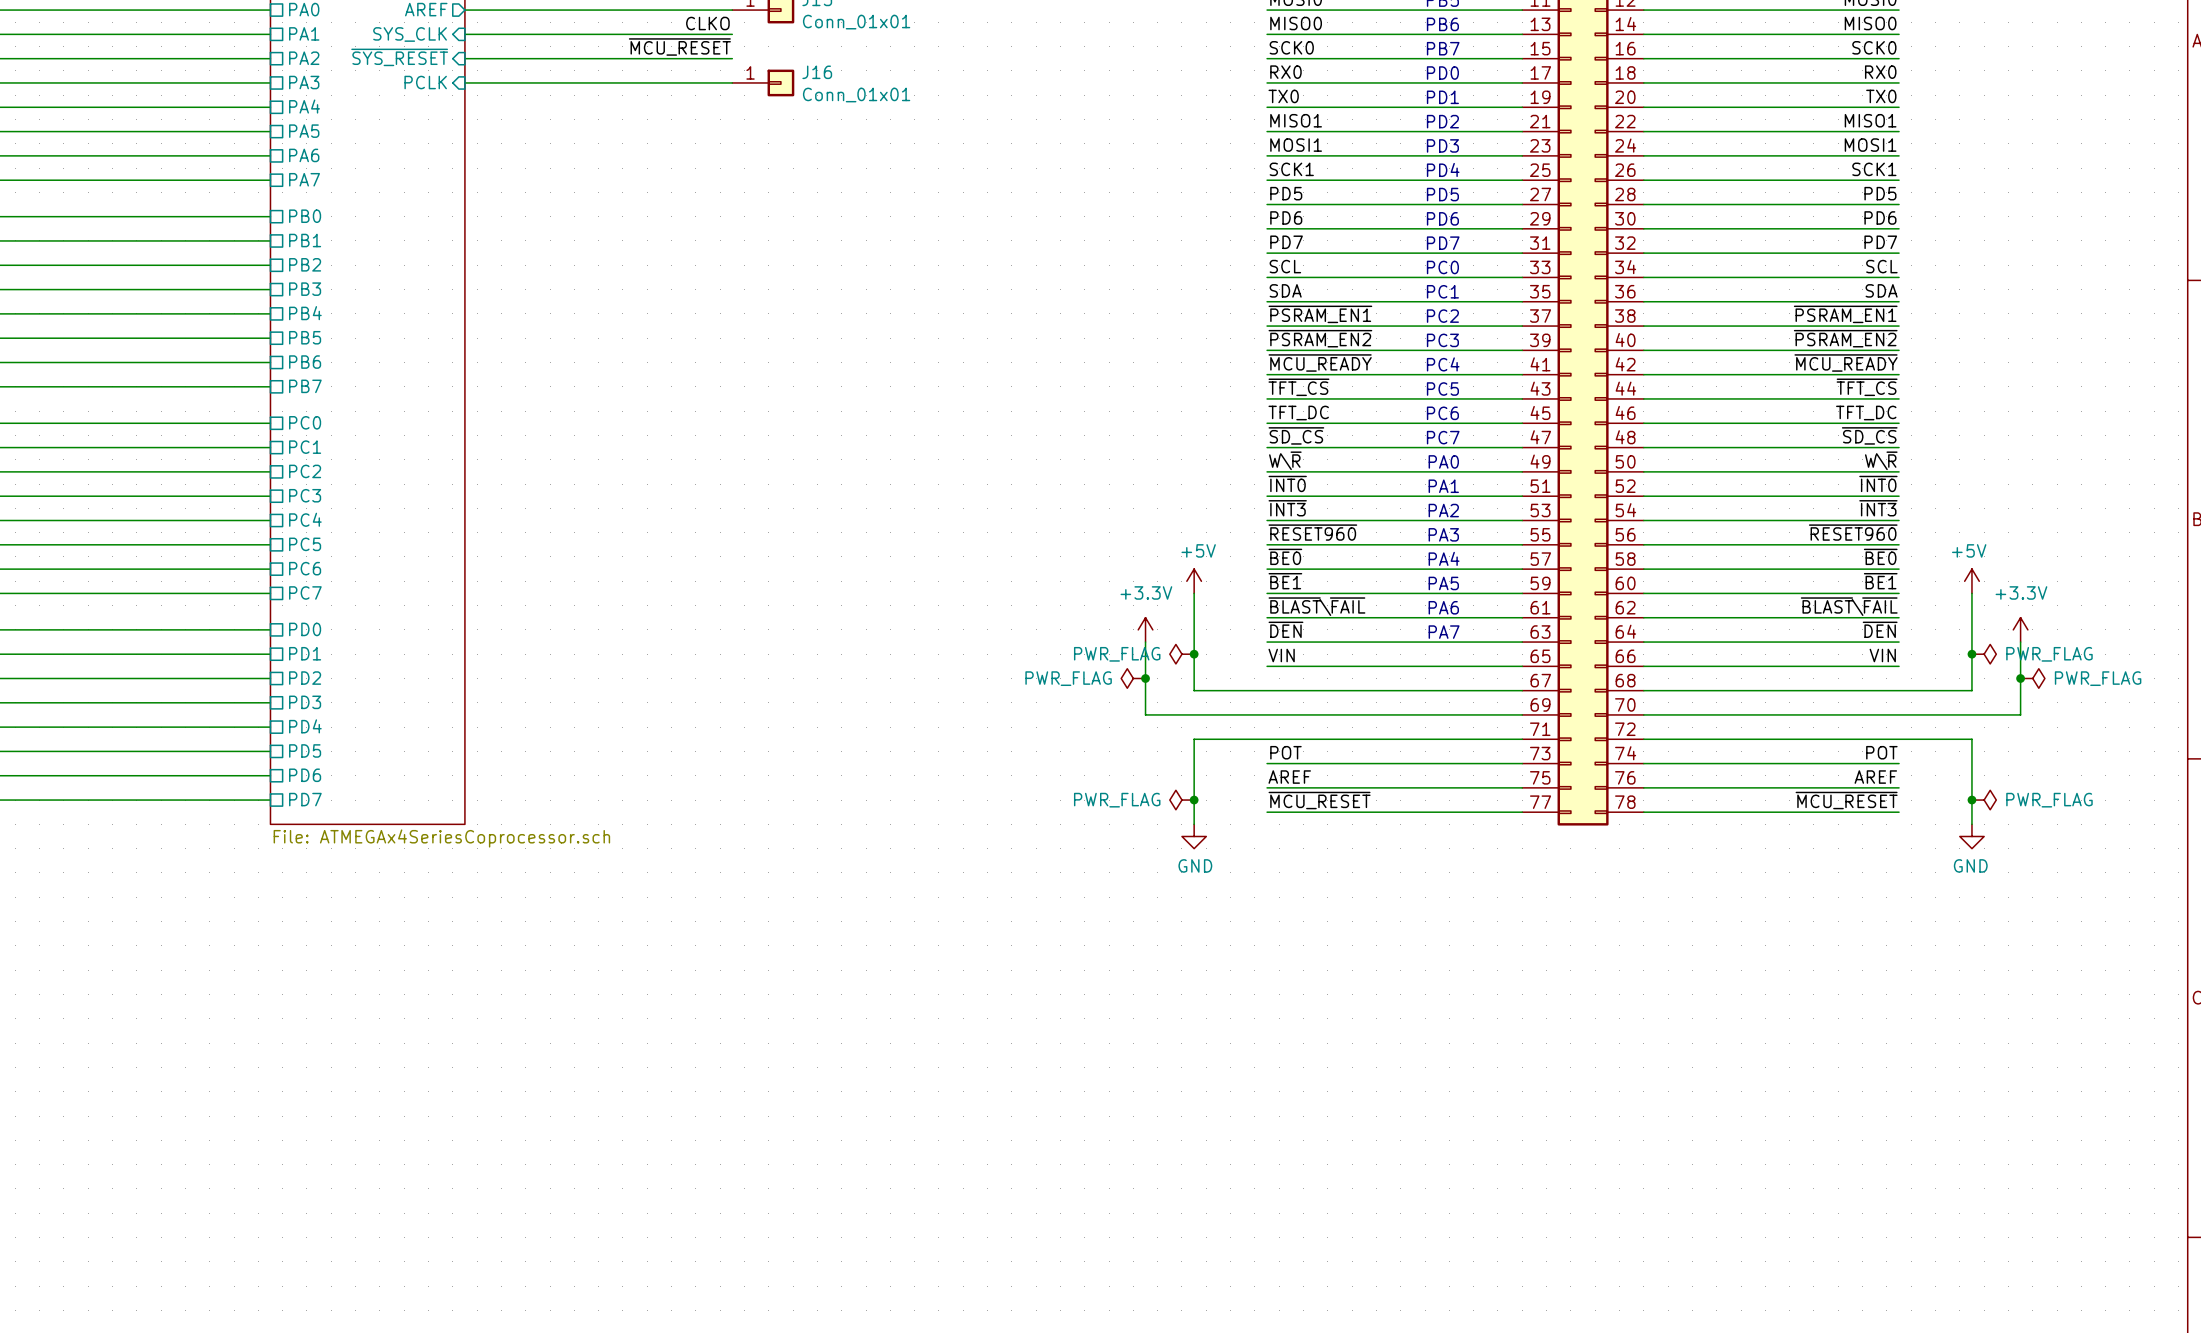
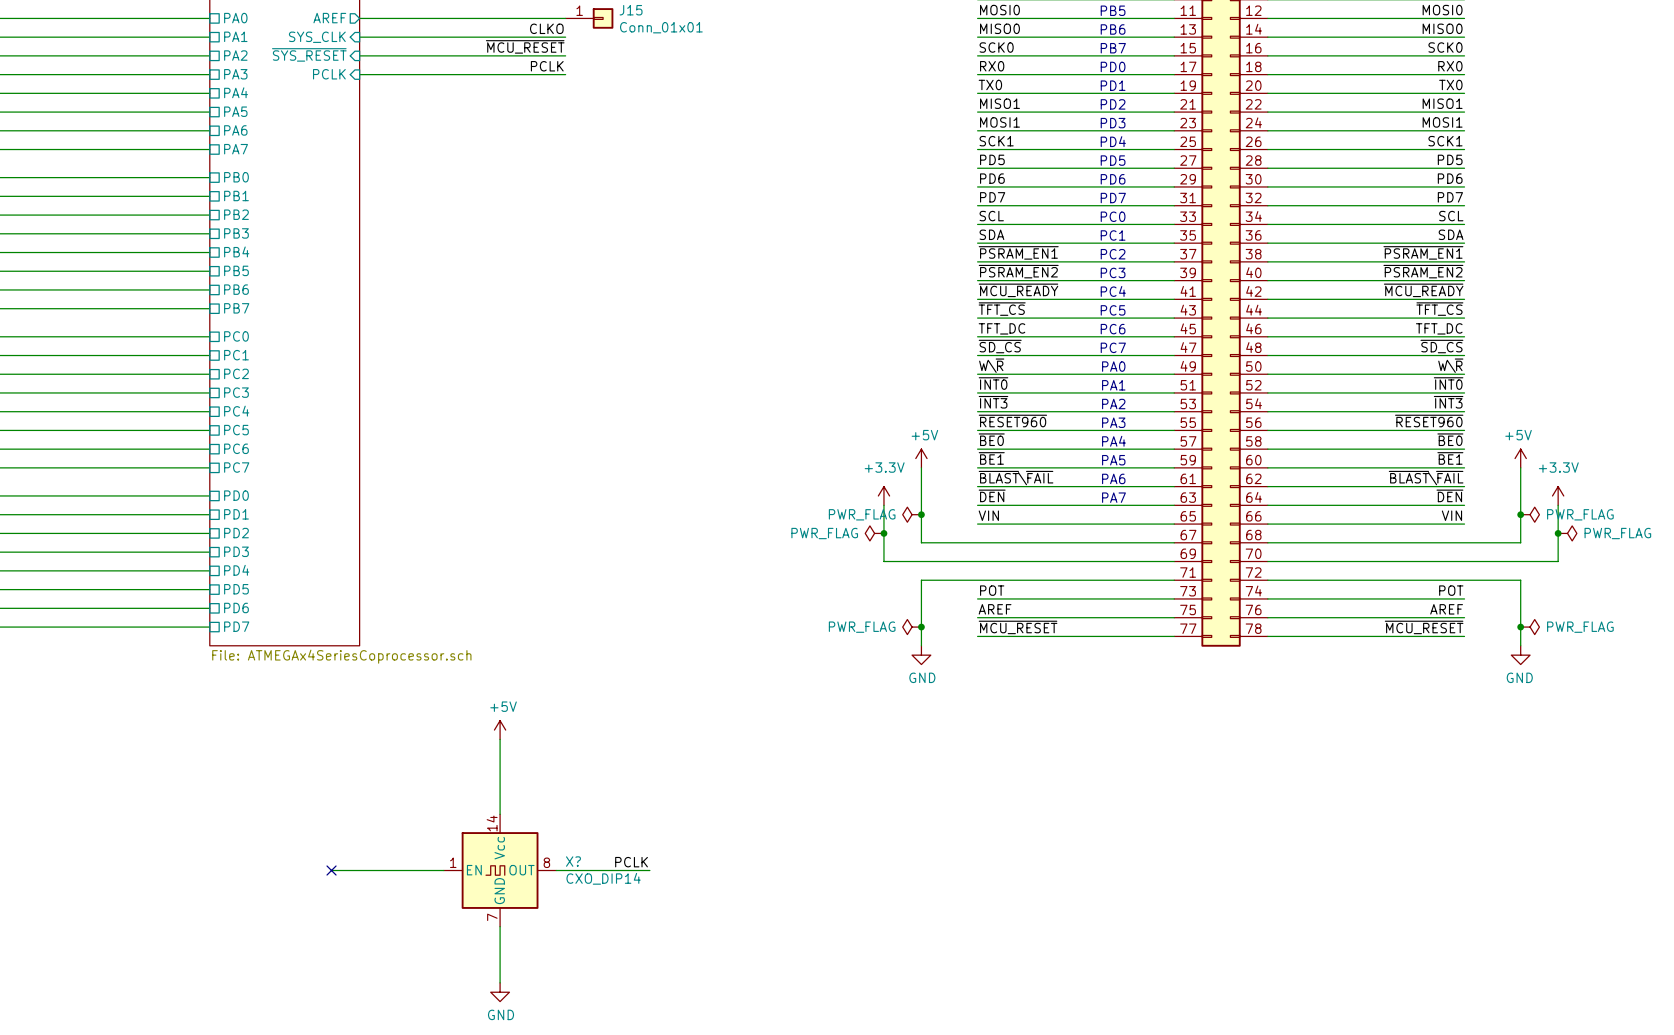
label: none -> PCLK (547, 66)
J16: Conn_01x01 (763, 82) -> none
power symbol: none -> +5V (500, 730)
wire: none -> (500, 739) (500, 814)
label: none -> PCLK (631, 862)
wire: none -> (331, 870) (443, 870)
no-connect mark: none -> (331, 870)
X?: none -> CXO_DIP14 (500, 870)
wire: none -> (556, 870) (649, 870)
wire: none -> (500, 926) (500, 982)
power symbol: none -> GND (500, 992)

